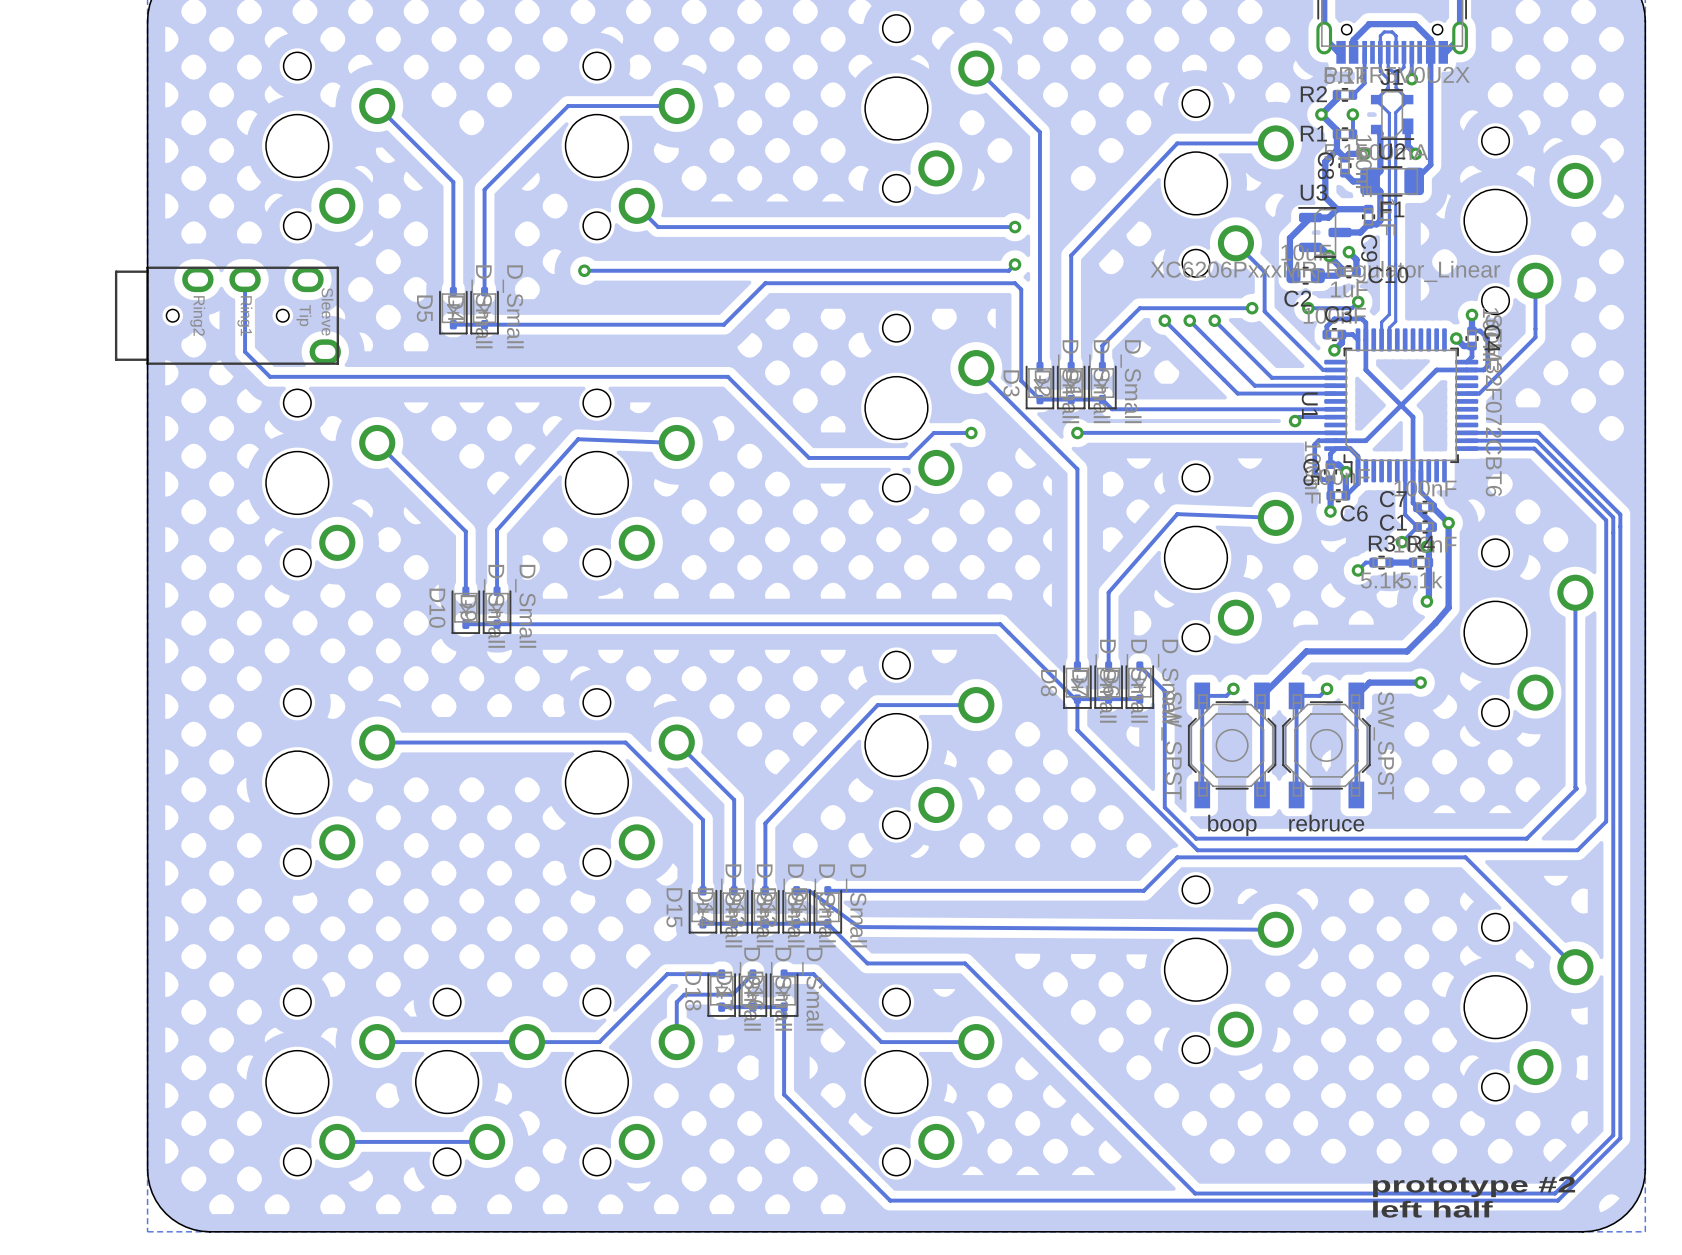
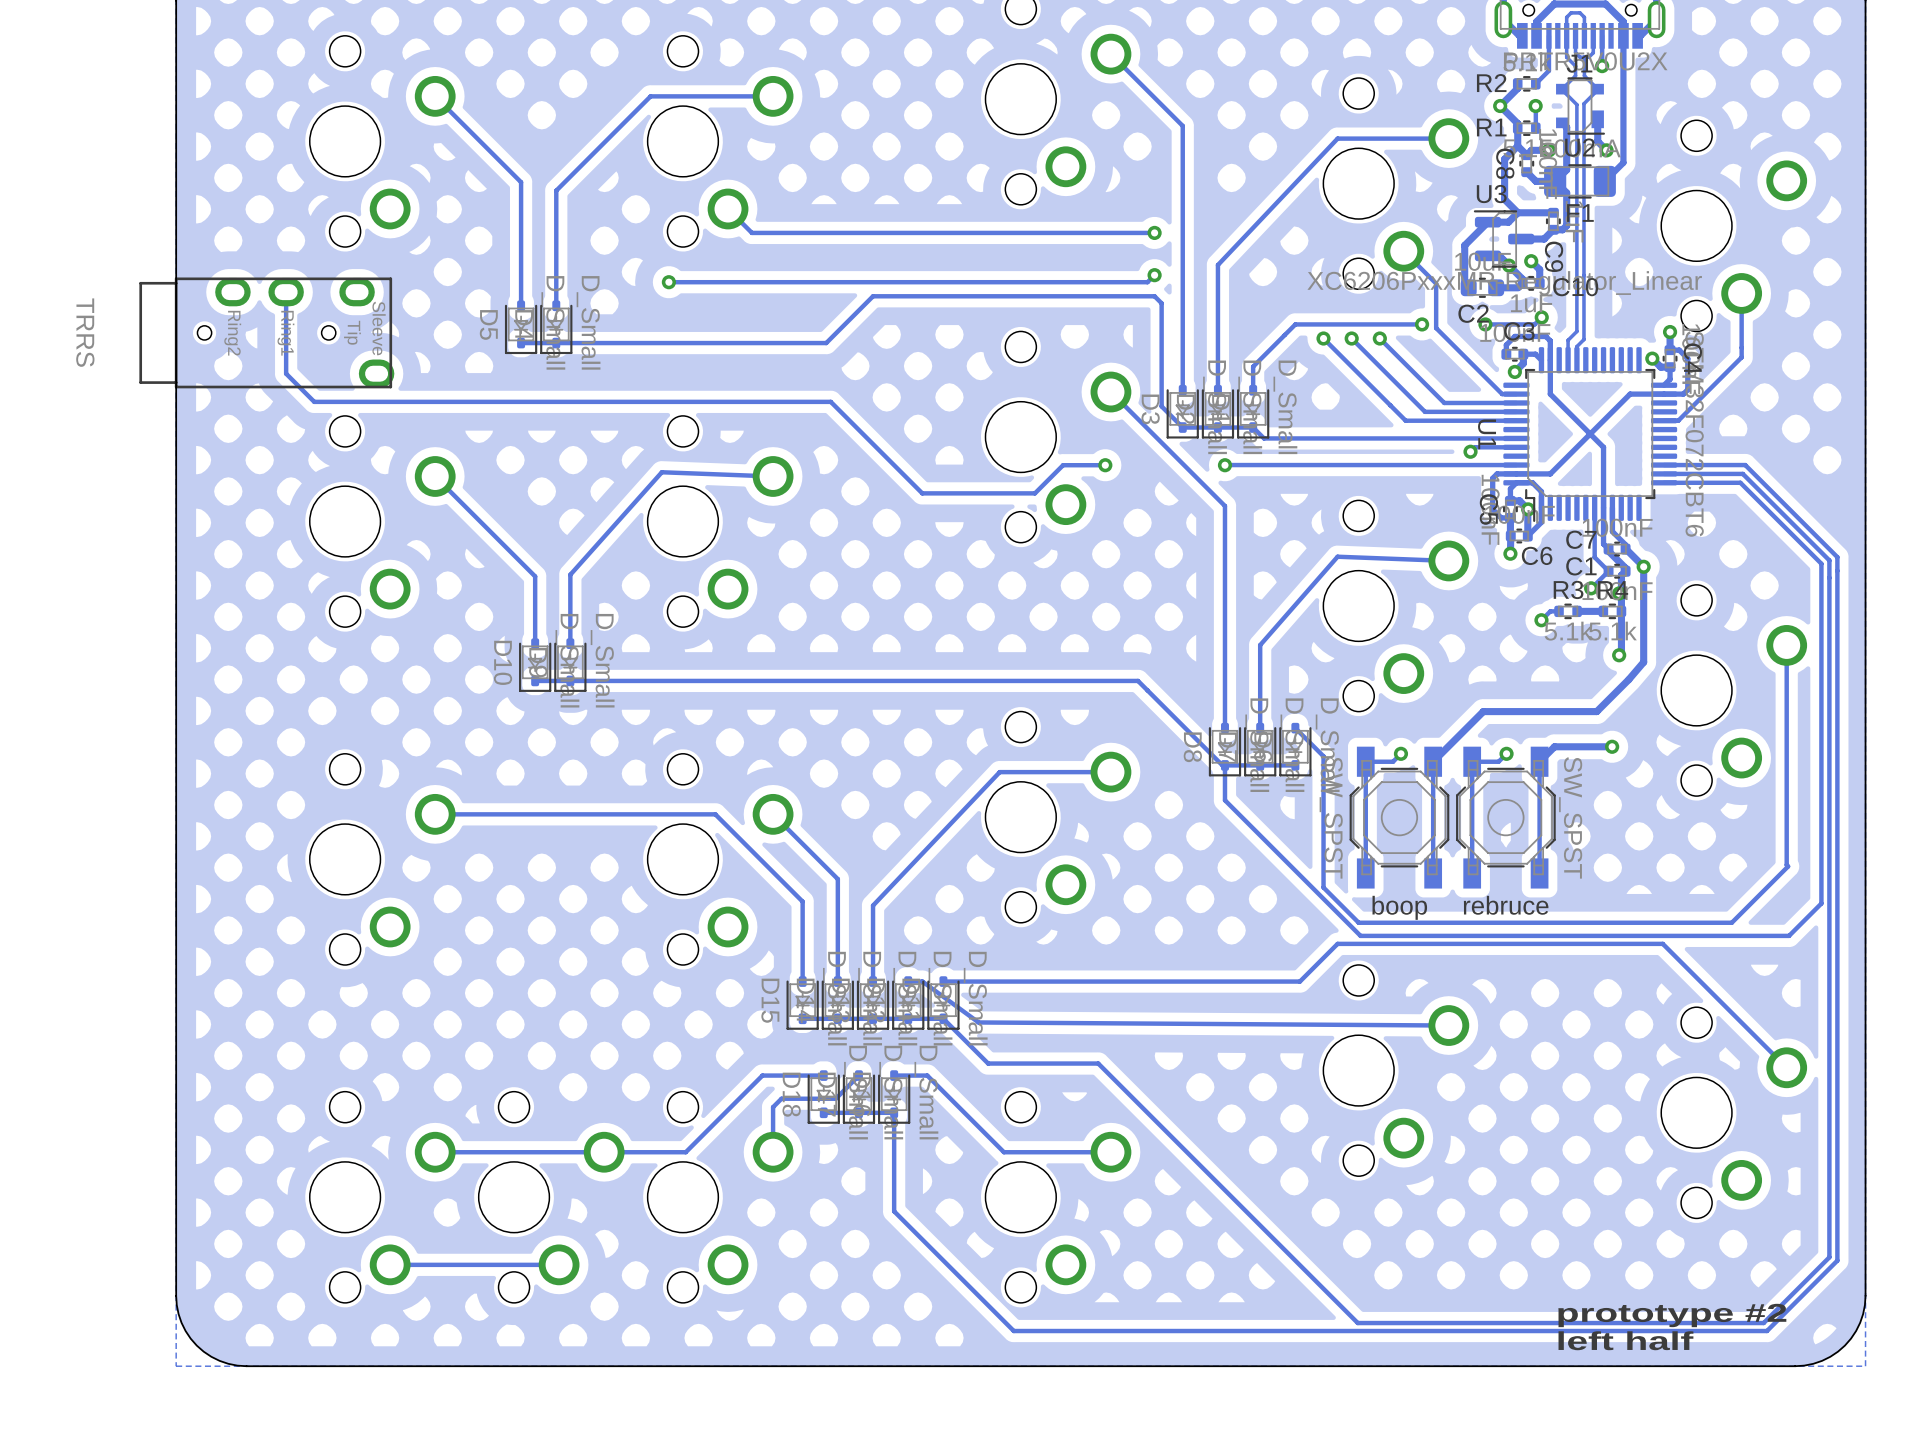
part value: none -> TRRS (85, 332)

